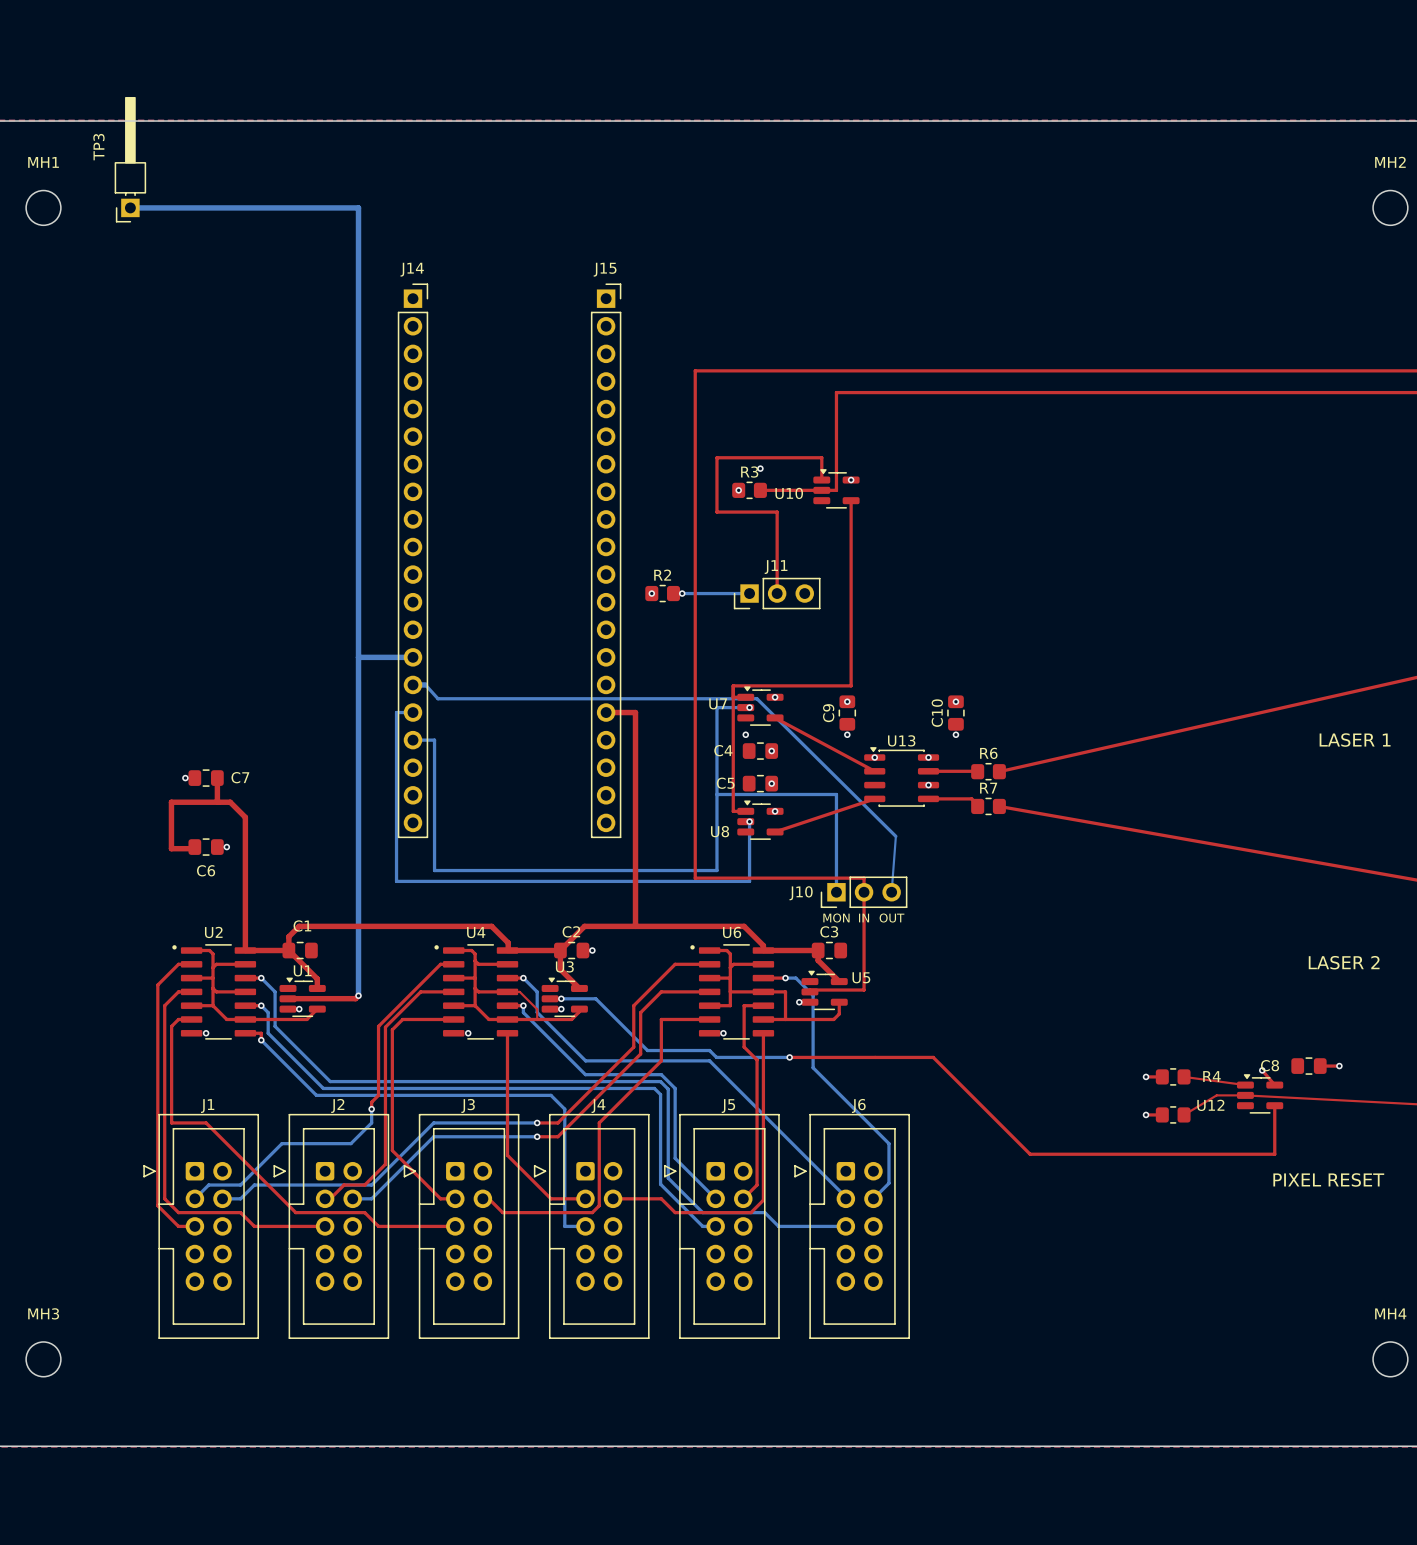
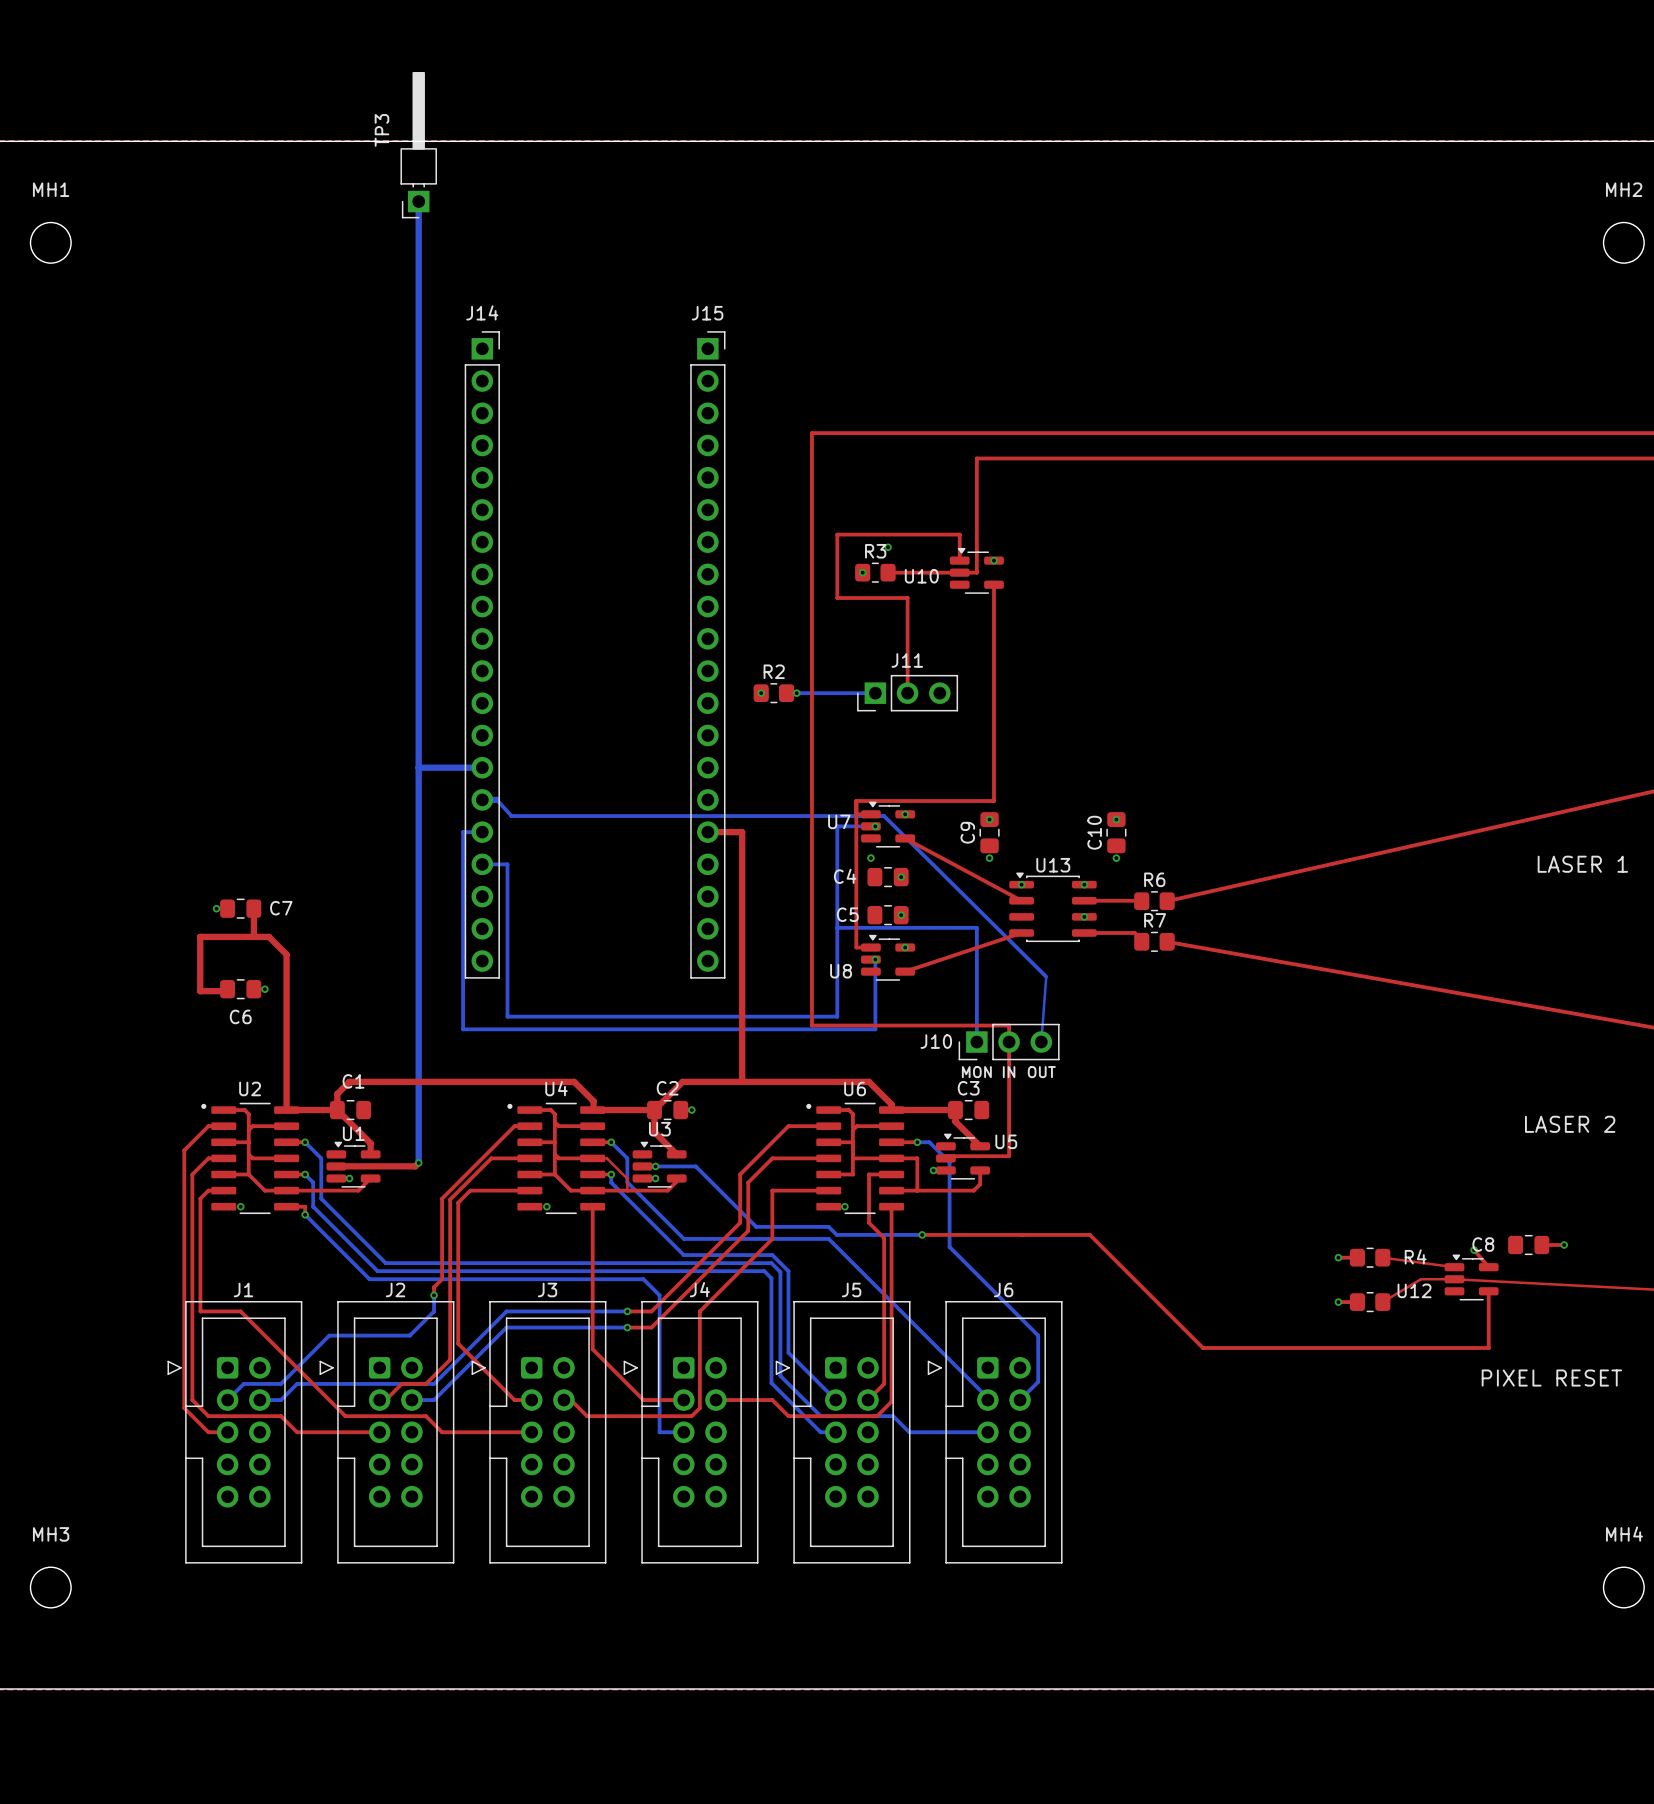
TP3 position: (130, 159) -> (418, 145)
bottom track: (130, 207) (358, 207) -> (418, 201) (418, 242)

